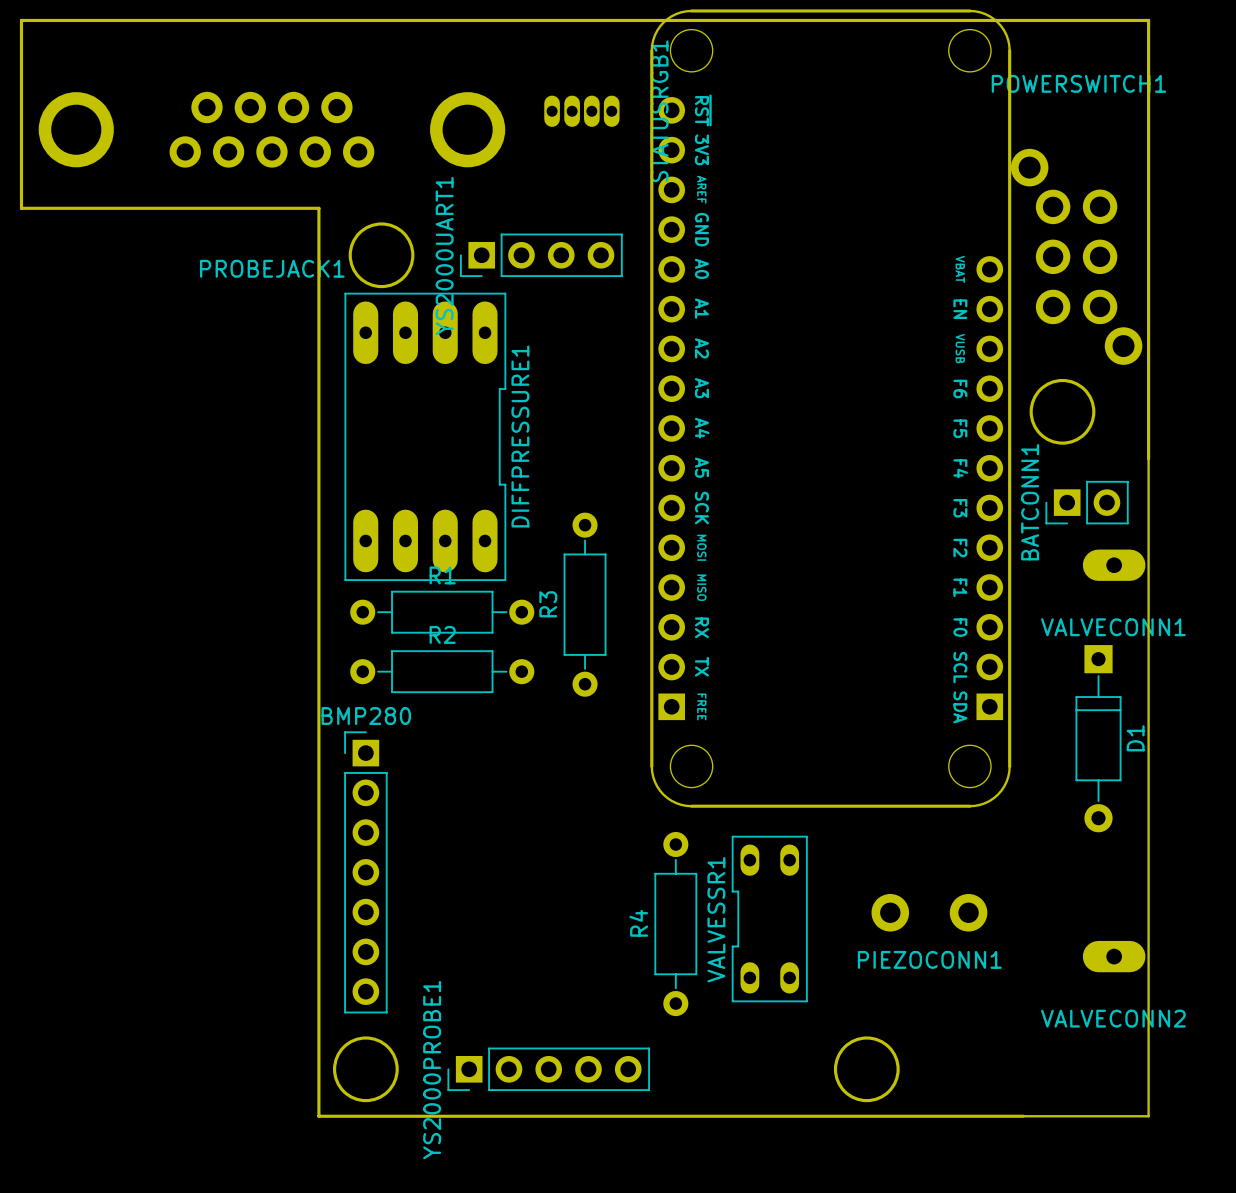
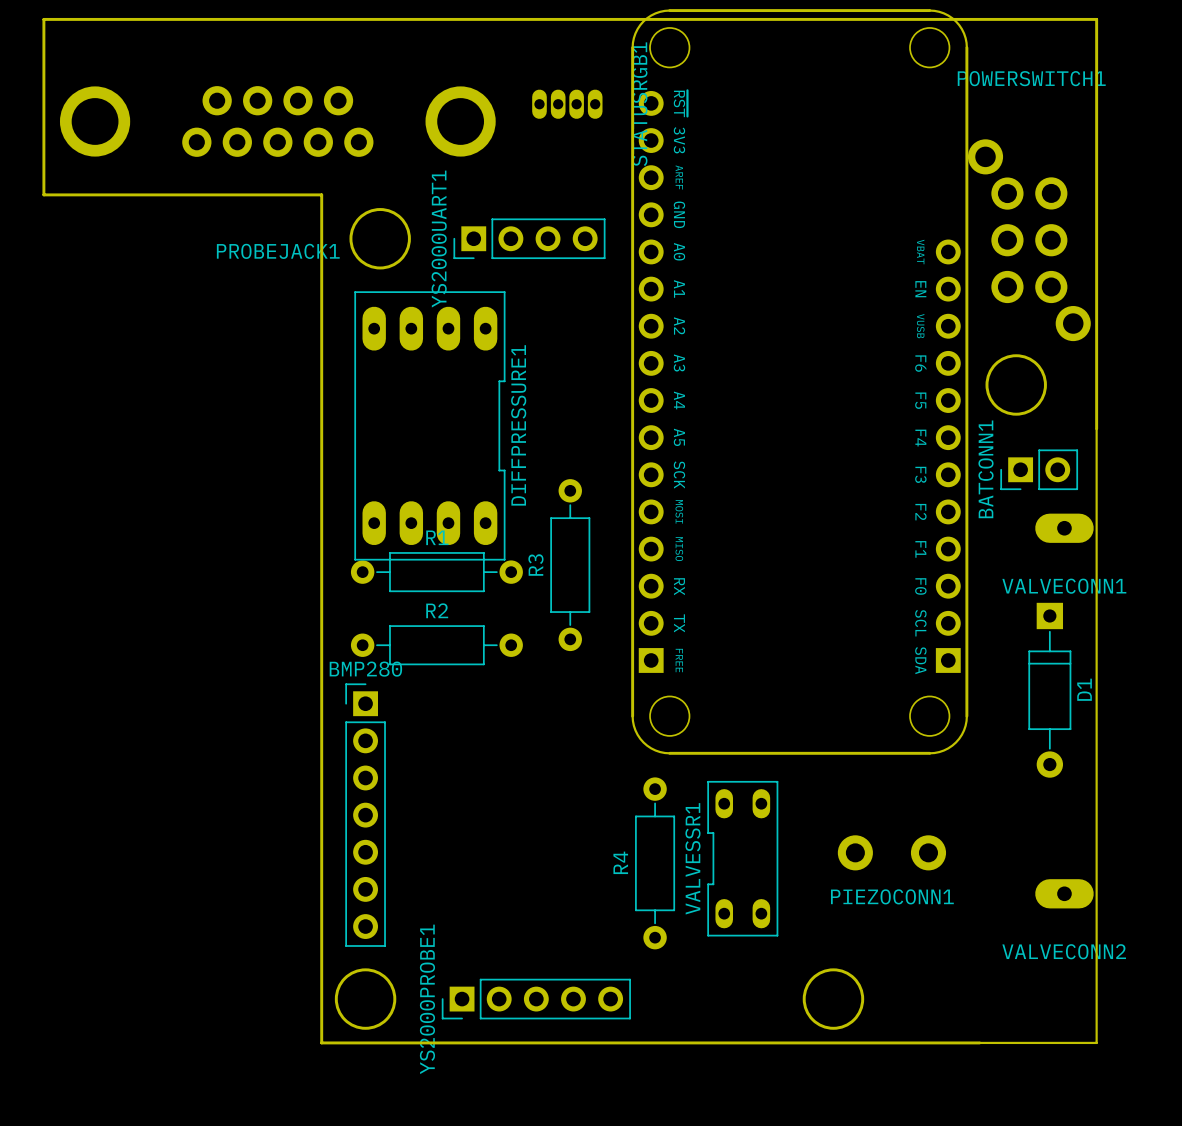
DIFFPRESSURE1 footprint: [344, 292, 507, 582] -> [354, 291, 506, 561]
R2 position: (442, 671) -> (436, 645)

